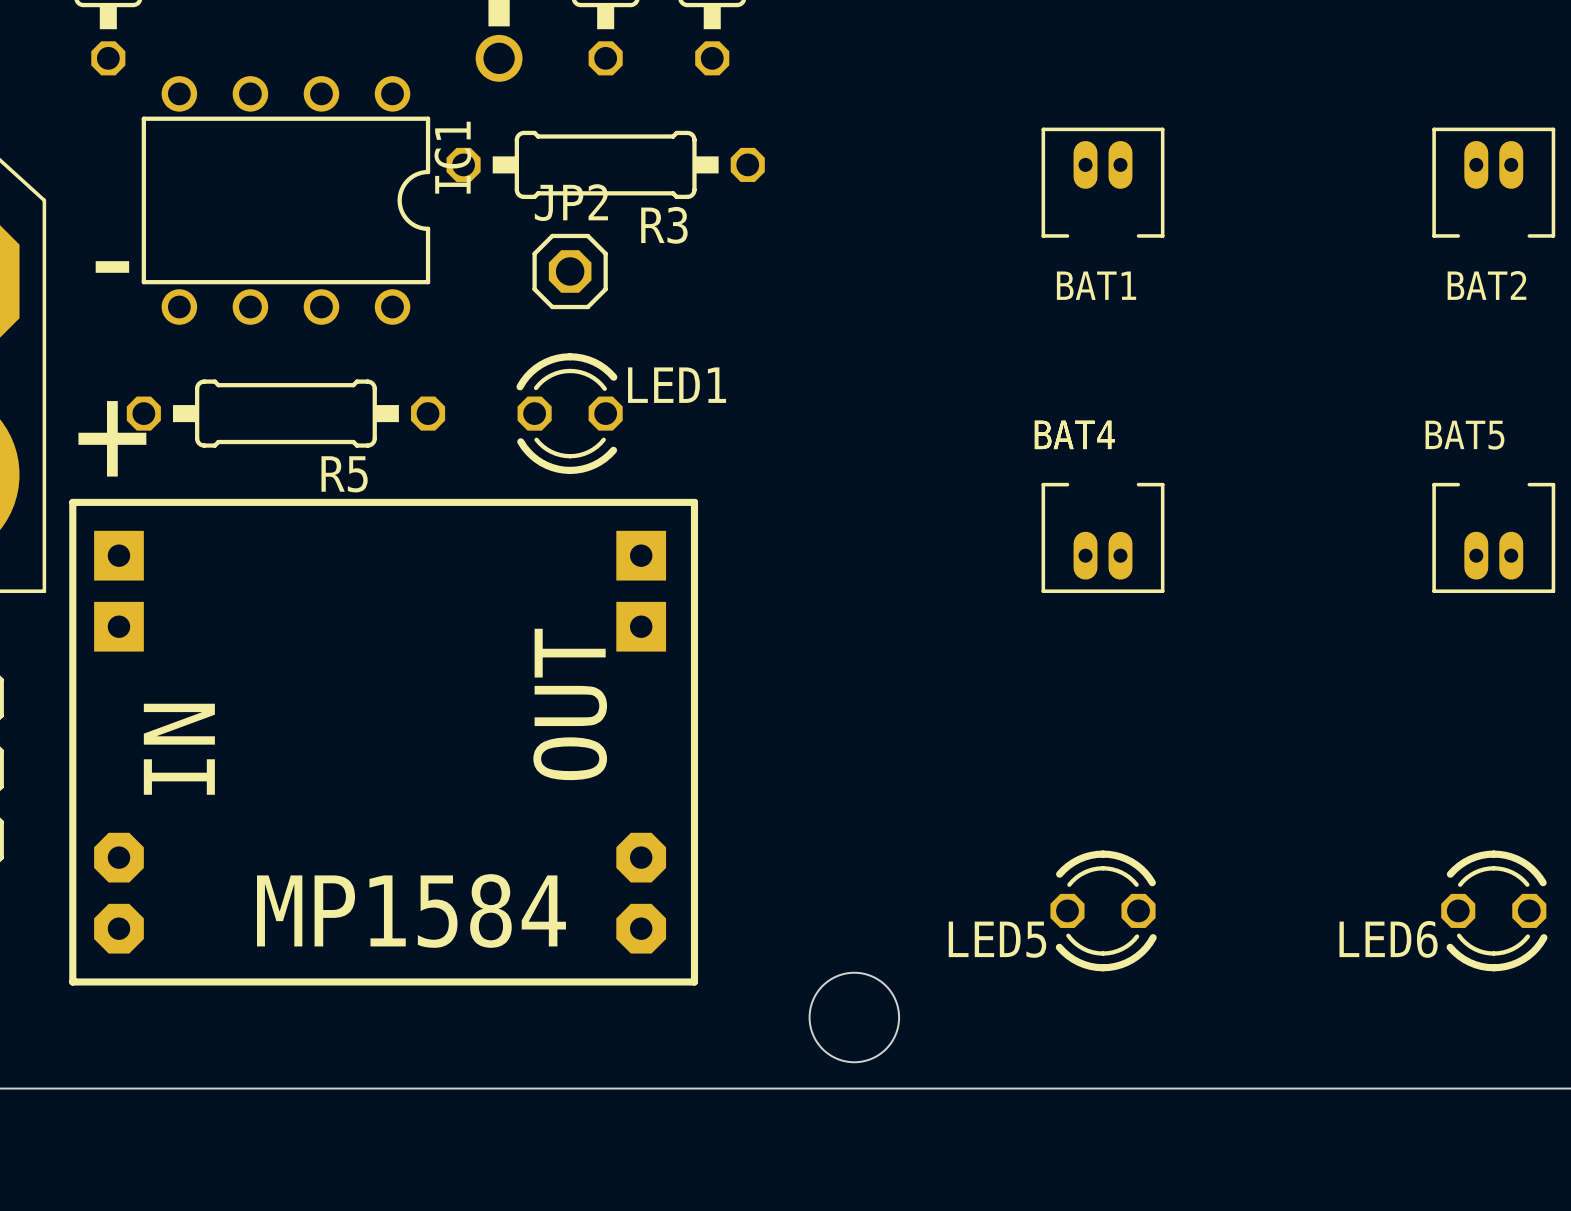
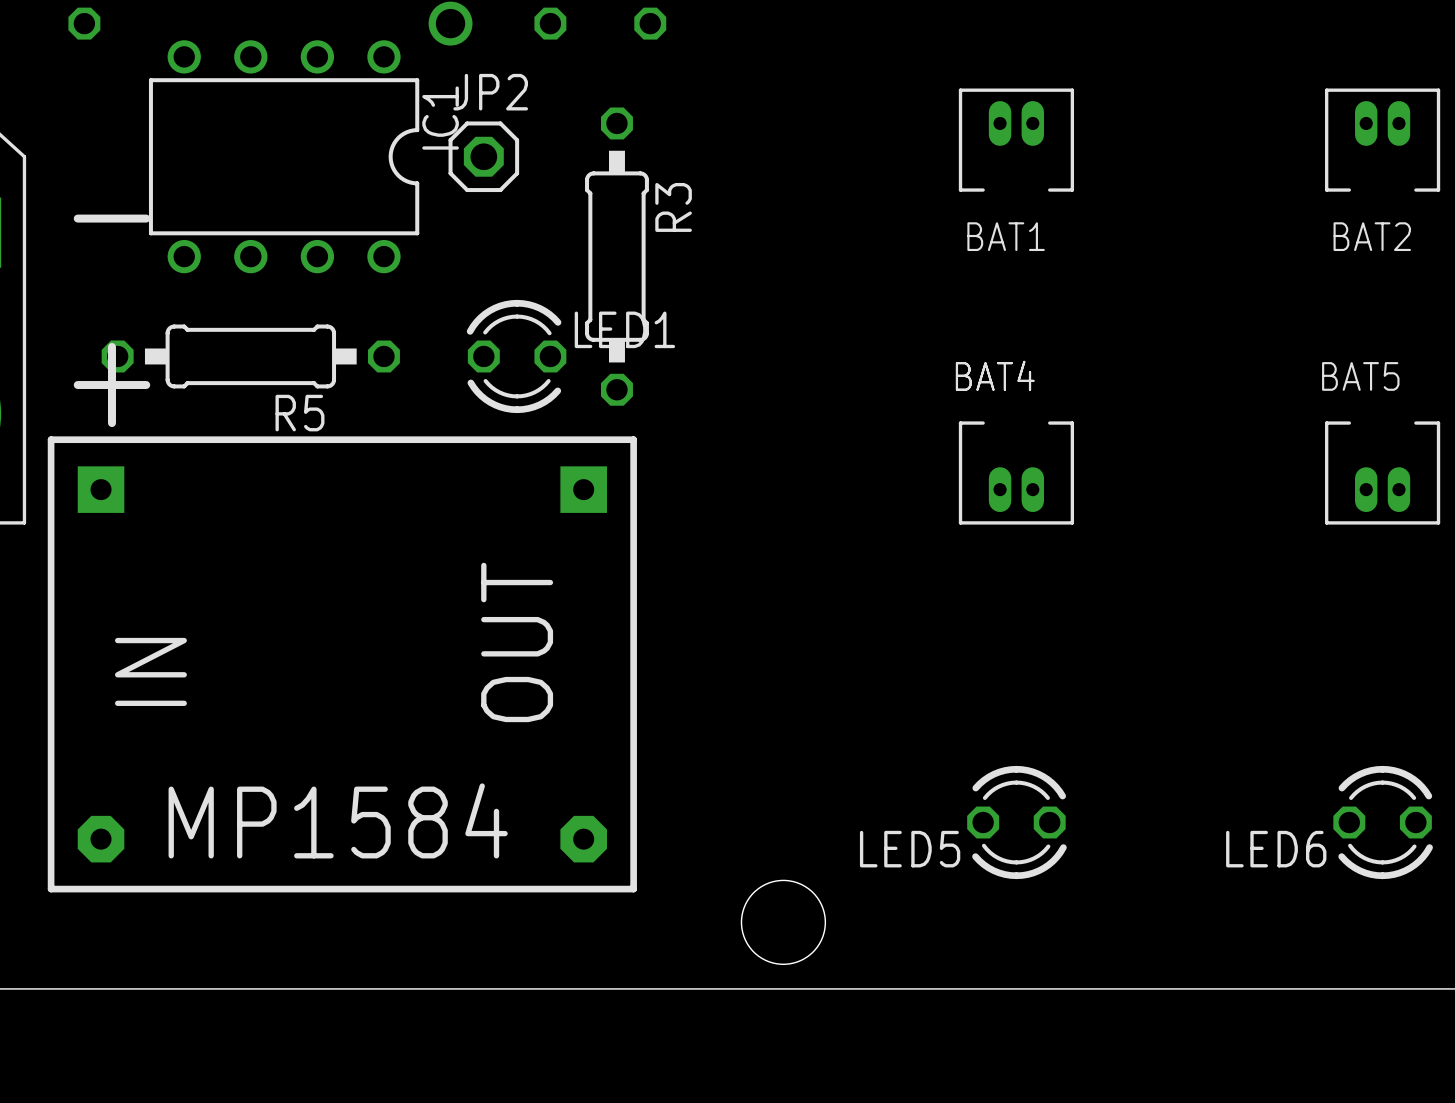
R3 rotation: 0° (605, 164) -> 90° clockwise (616, 256)
IC1 position: (285, 200) -> (284, 156)
R3 name position: R3 (664, 225) -> R3 (673, 207)
JP2 position: (570, 271) -> (483, 156)
part footprint: [69, 498, 699, 986] -> [47, 436, 637, 893]

